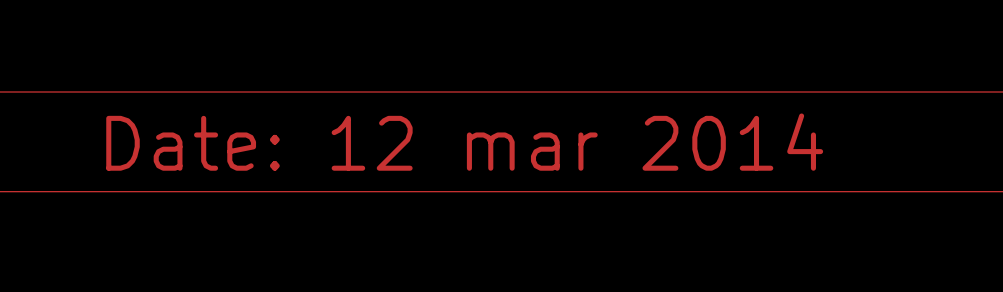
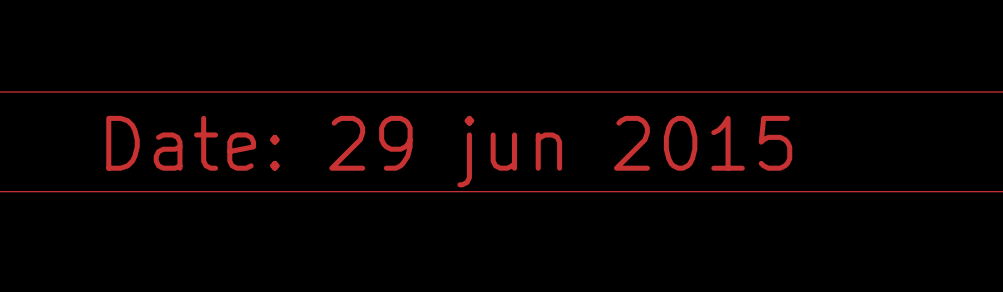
title block: Date: 12 mar 2014 (464, 142) -> Date: 29 jun 2015 (449, 151)

